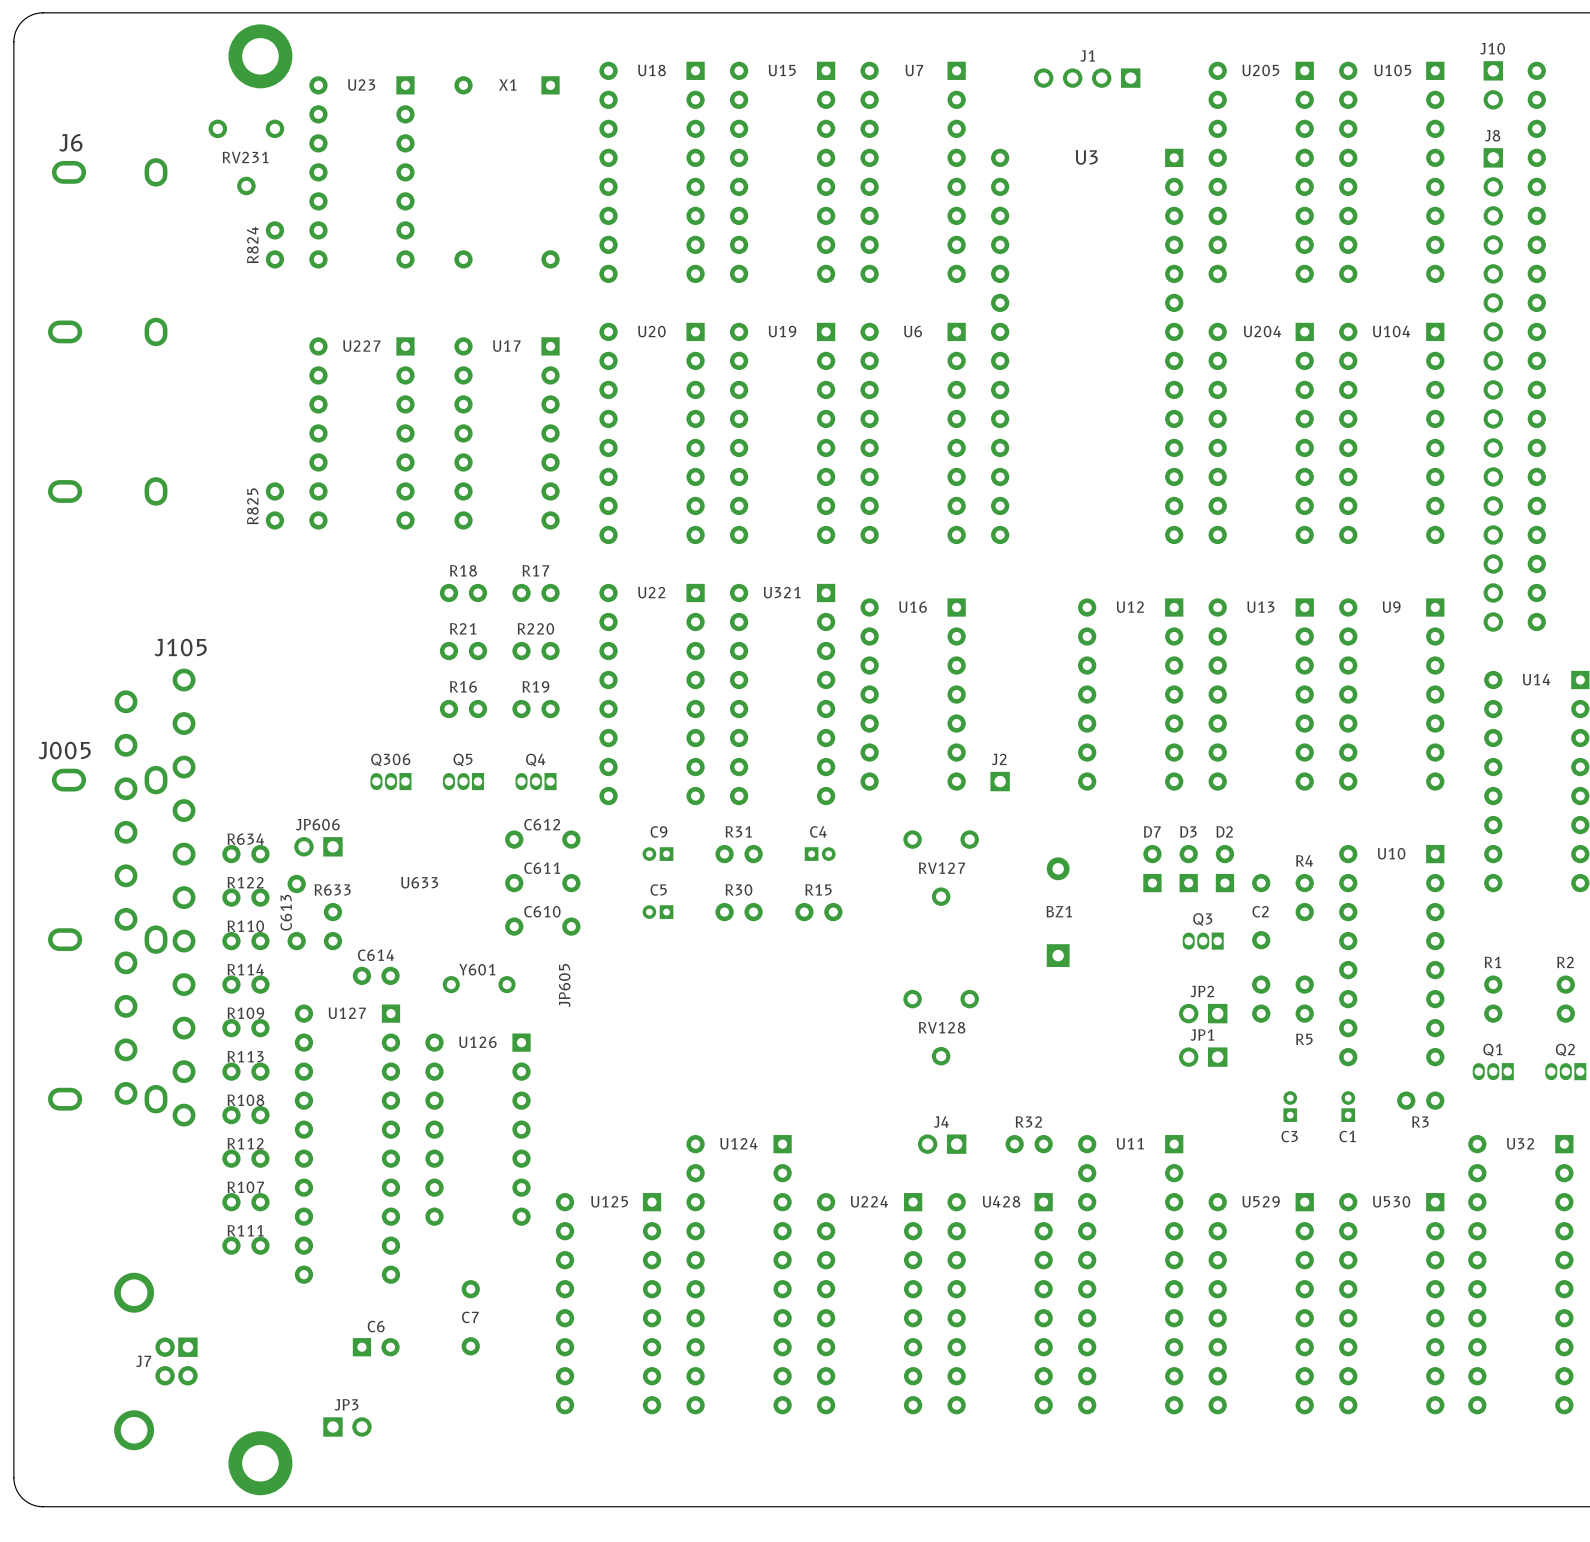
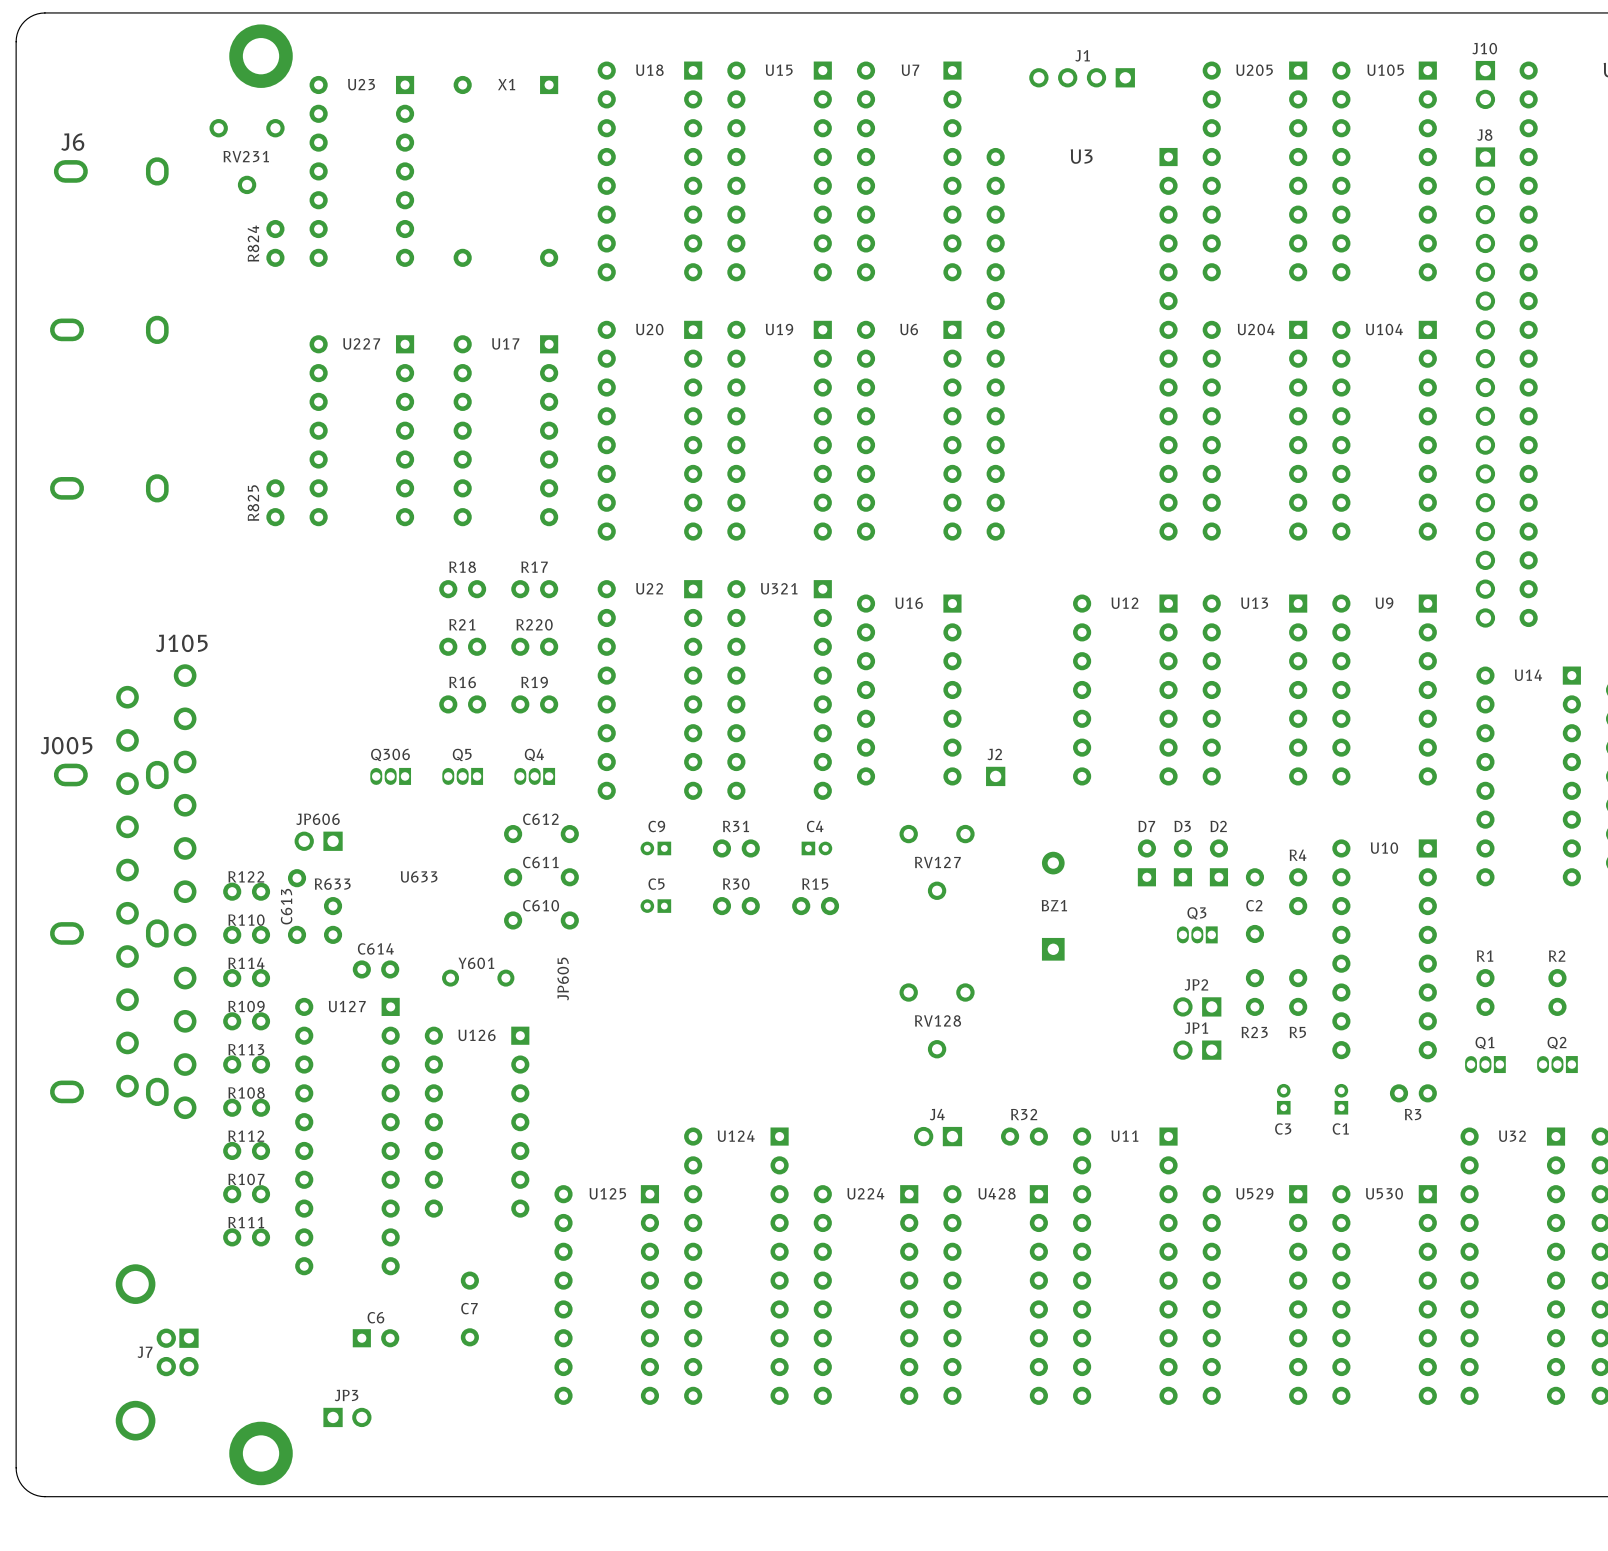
R634: (245, 854) -> none
R23 name: none -> R23 (1254, 1032)

